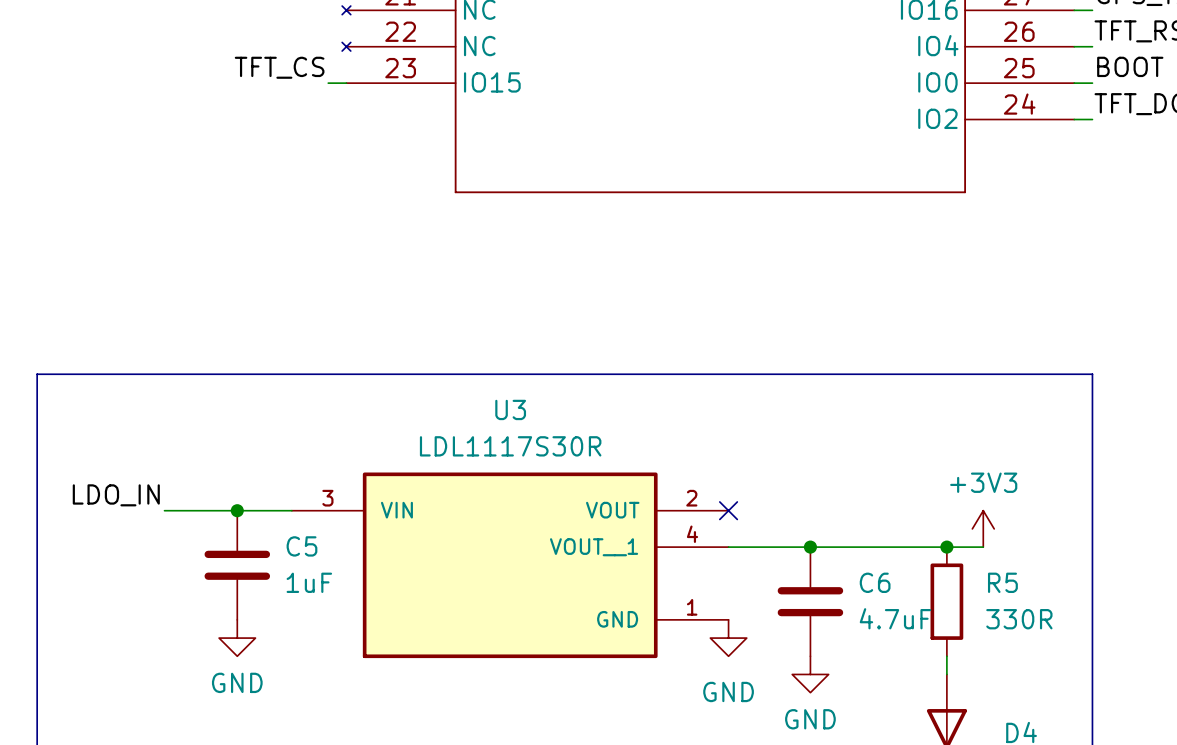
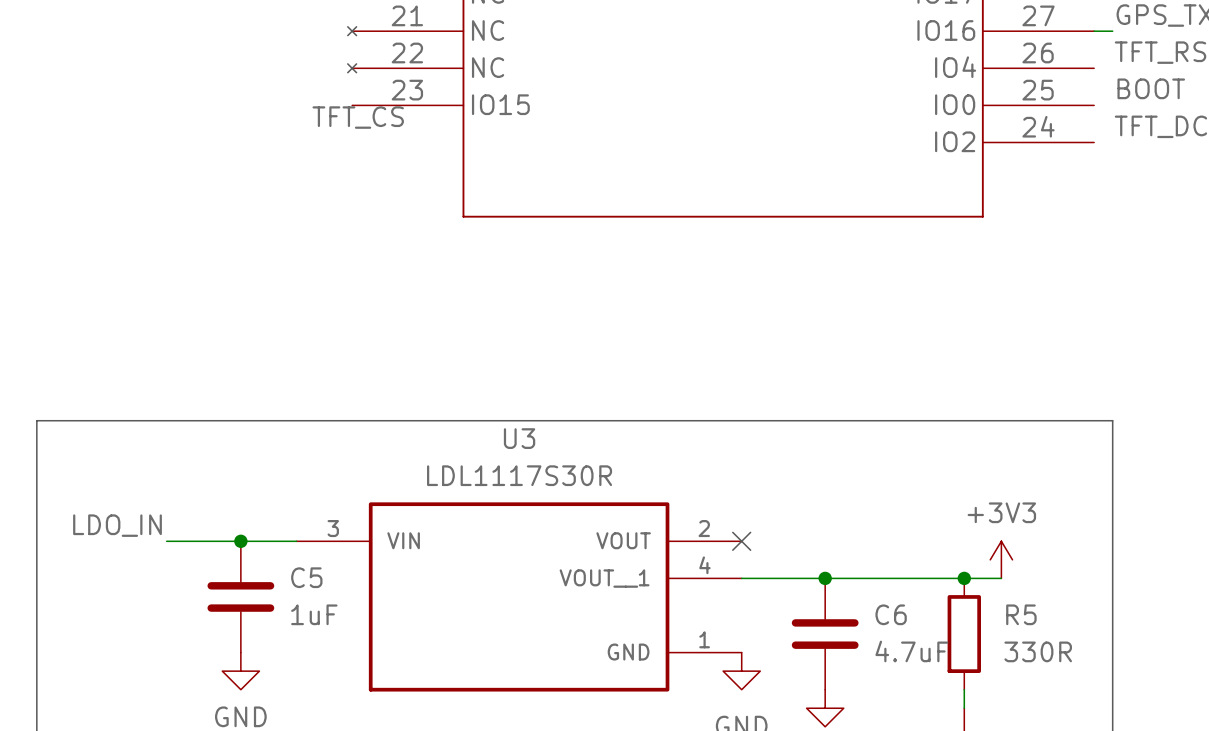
wire: (1074, 46) (1092, 46) -> none
label position: TFT_CS (279, 67) -> TFT_CS (358, 117)
wire: (328, 83) (346, 83) -> none
wire: (1074, 83) (1092, 83) -> none
wire: (1074, 119) (1092, 119) -> none
line: (37, 392) (37, 374) (1092, 374) (1092, 392) -> (36, 420) (1112, 420)

